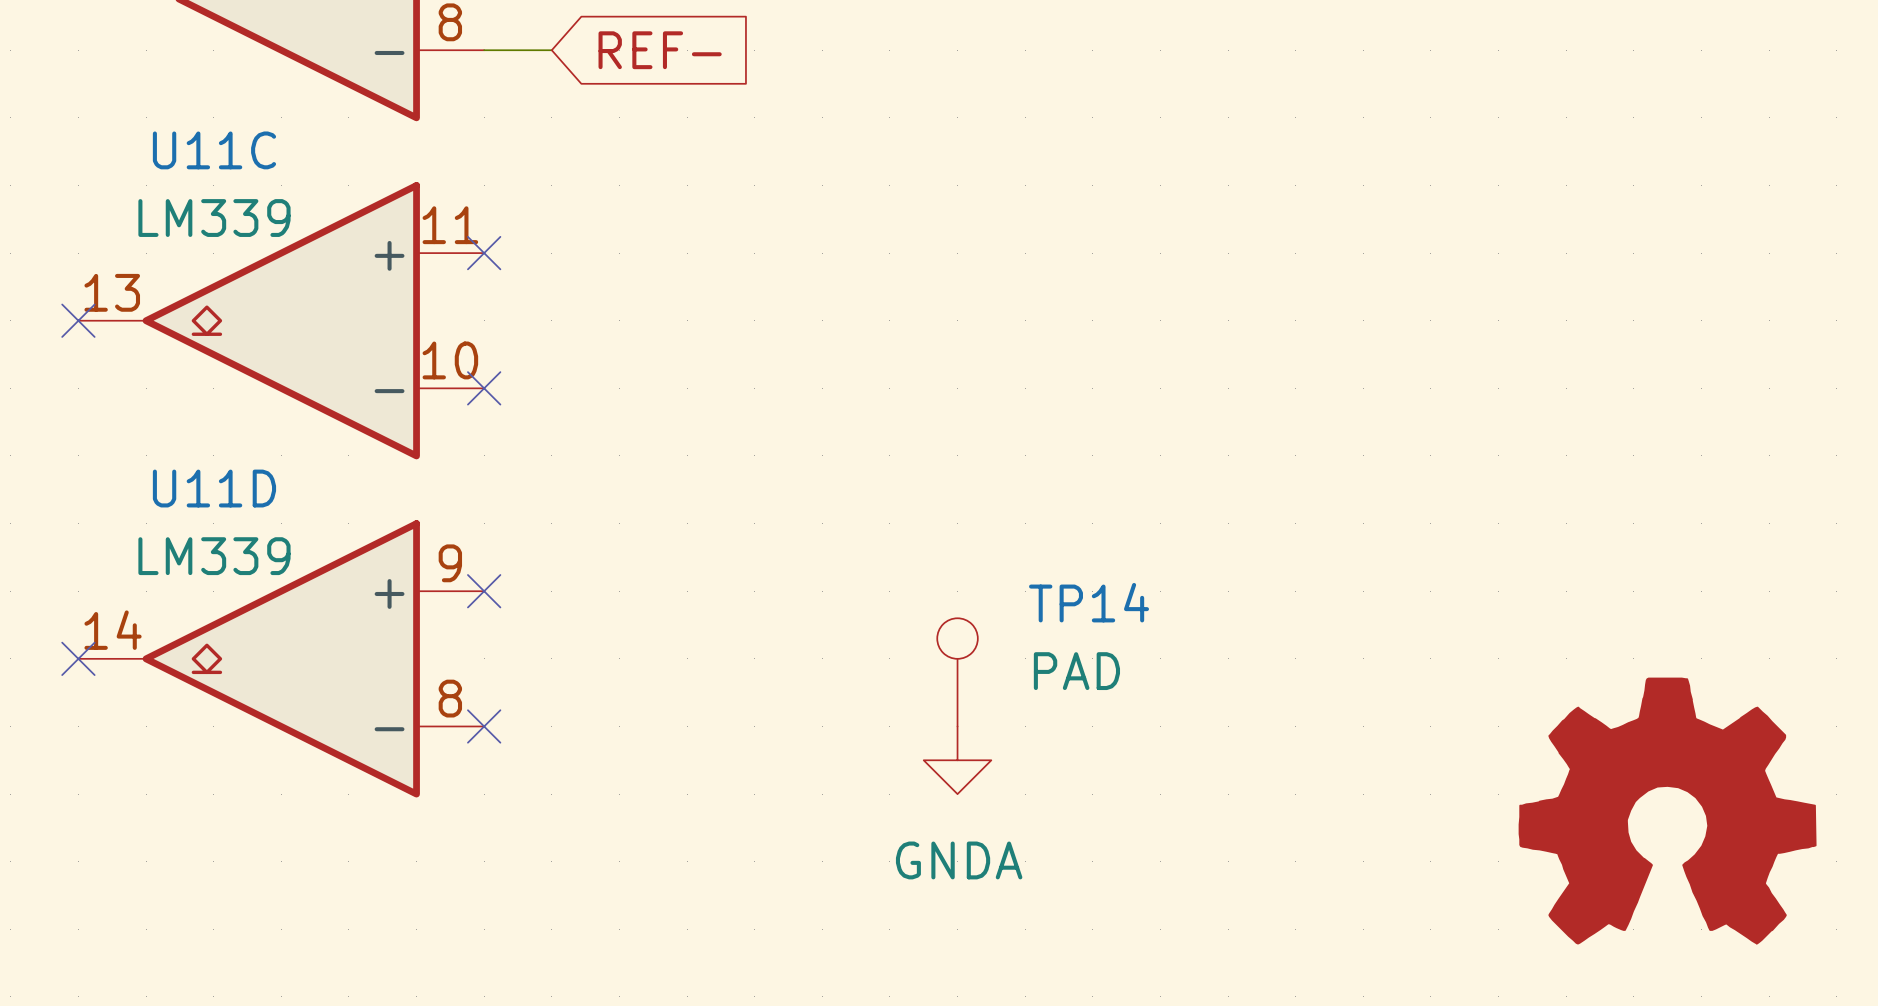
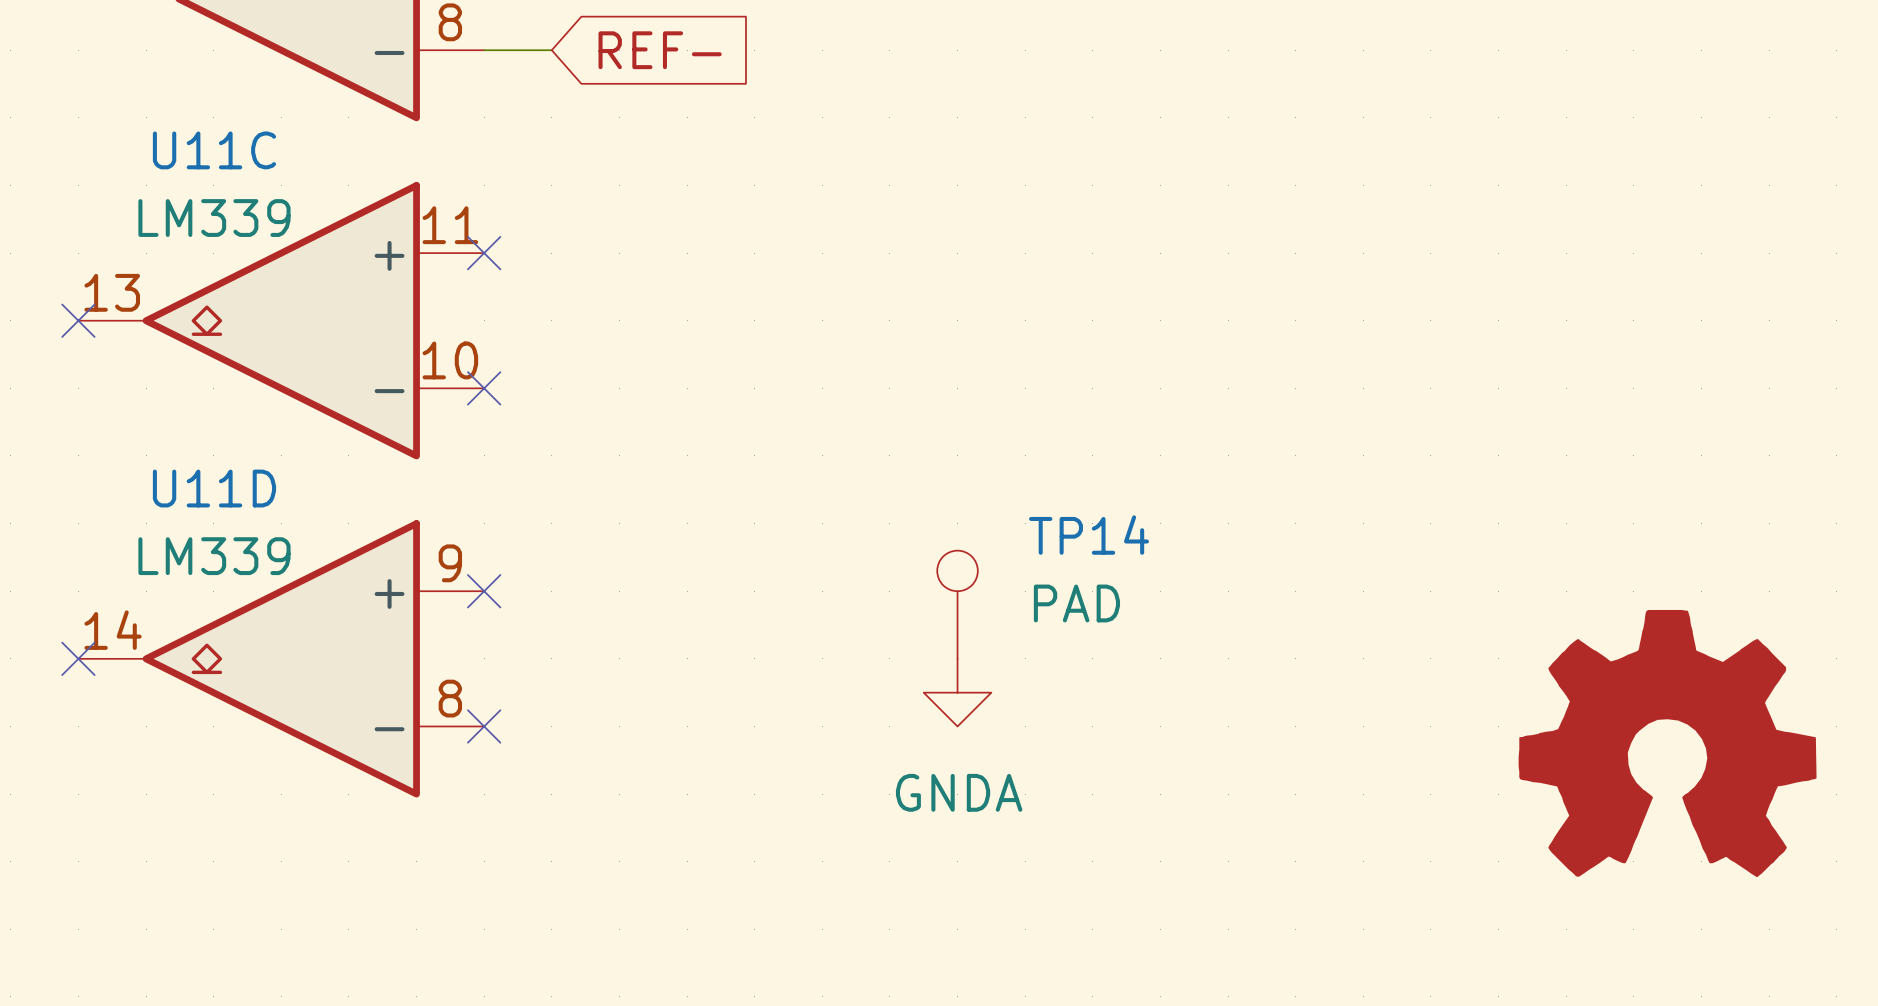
TP14 position: (957, 672) -> (957, 604)
power symbol position: GNDA (957, 760) -> GNDA (957, 692)
power symbol position: (1667, 811) -> (1667, 743)

